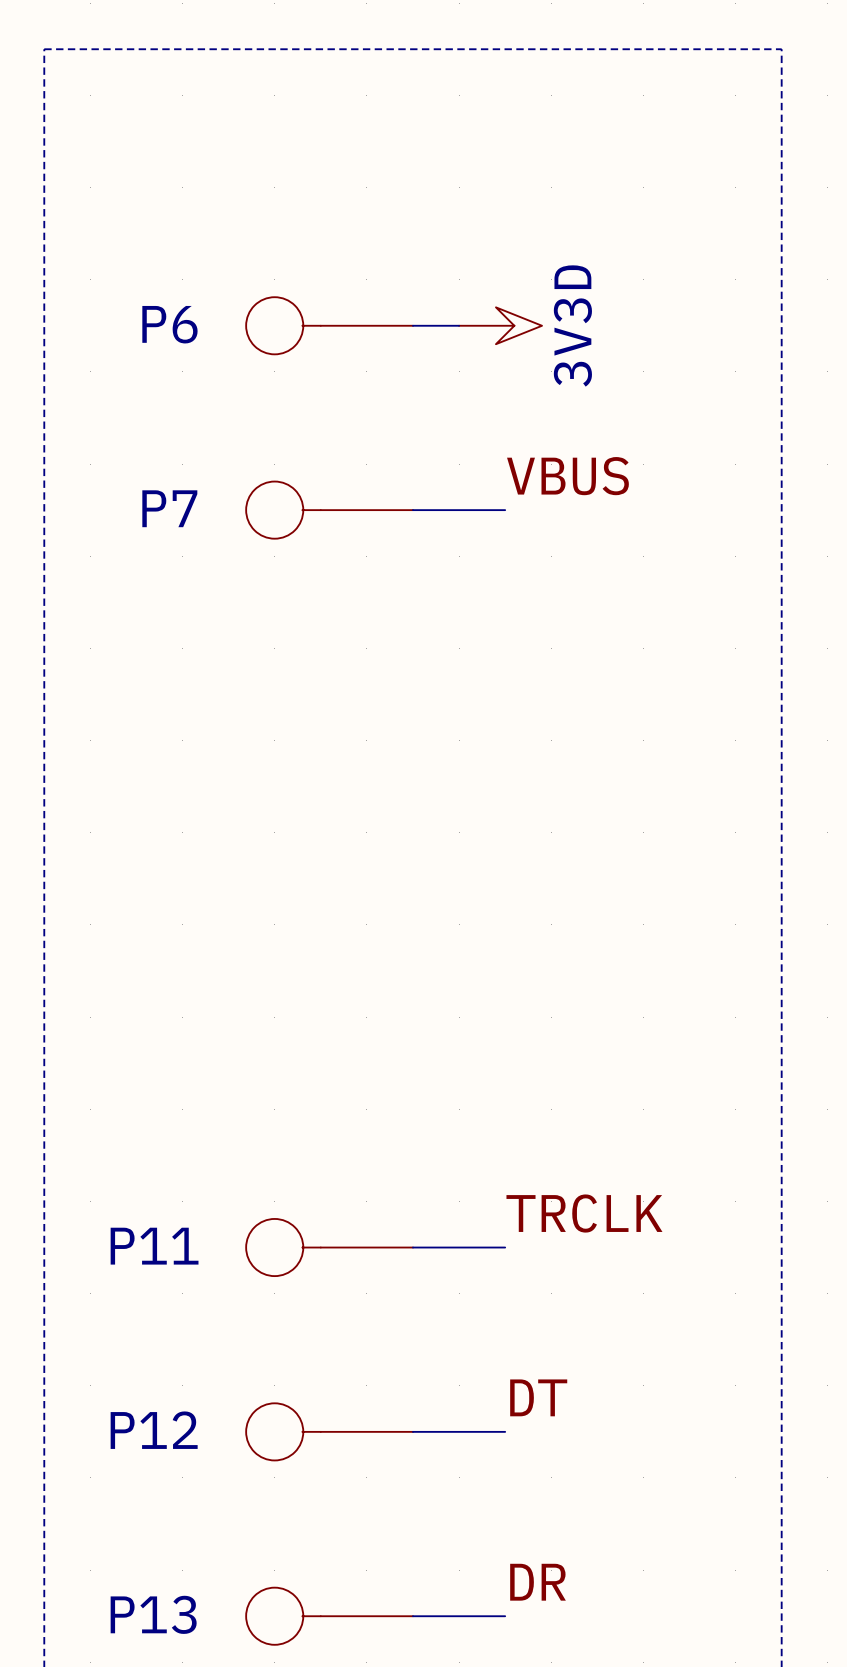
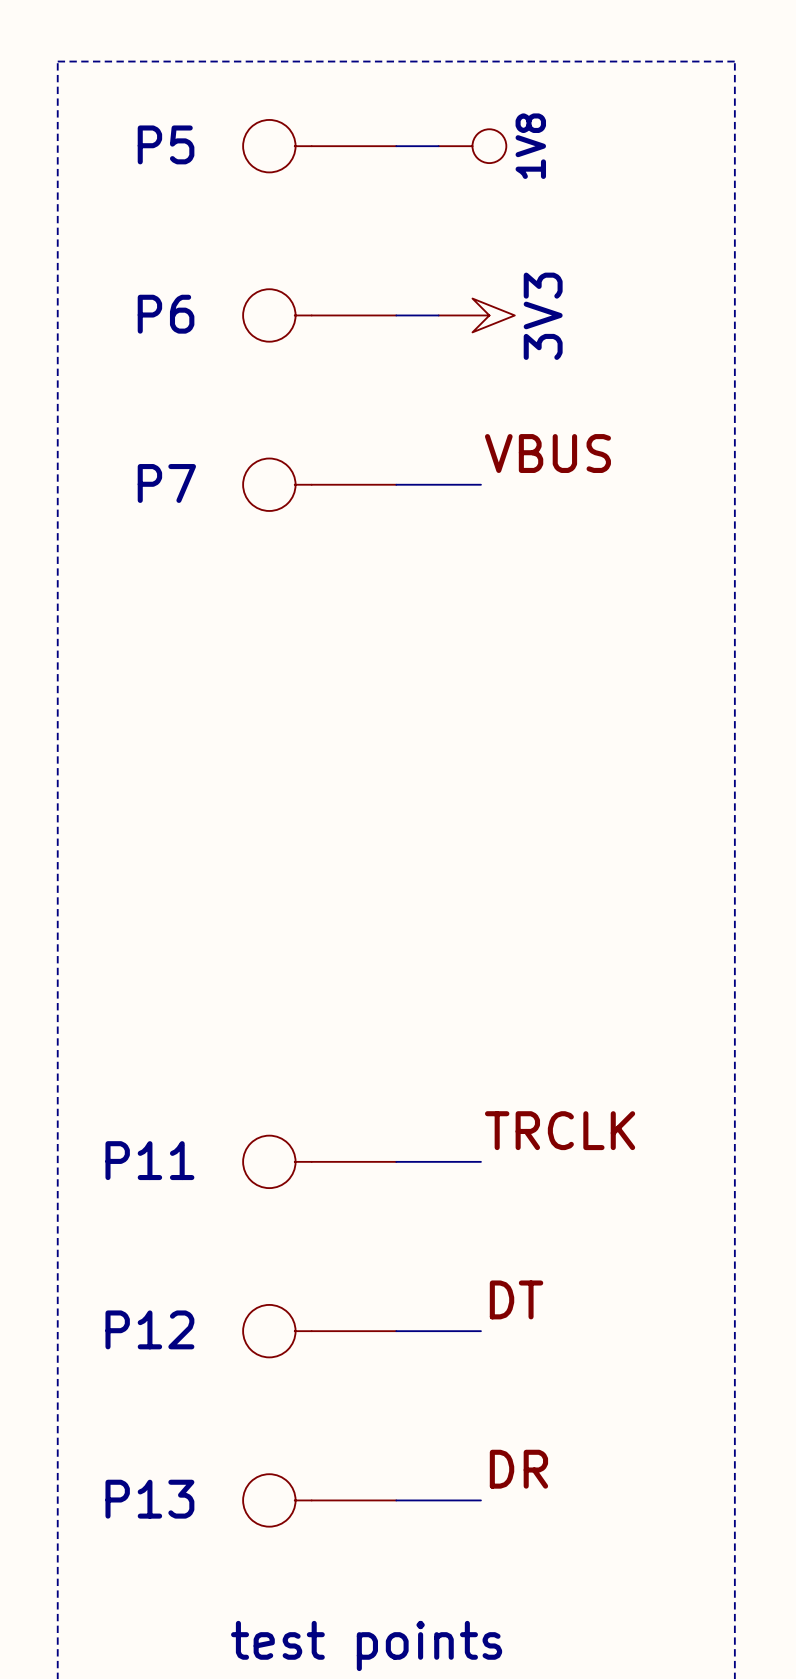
P5: none -> (319, 146)
wire: none -> (396, 146) (438, 146)
power symbol: none -> 1V8 (472, 146)
power symbol: 3V3D (500, 325) -> 3V3 (476, 315)

